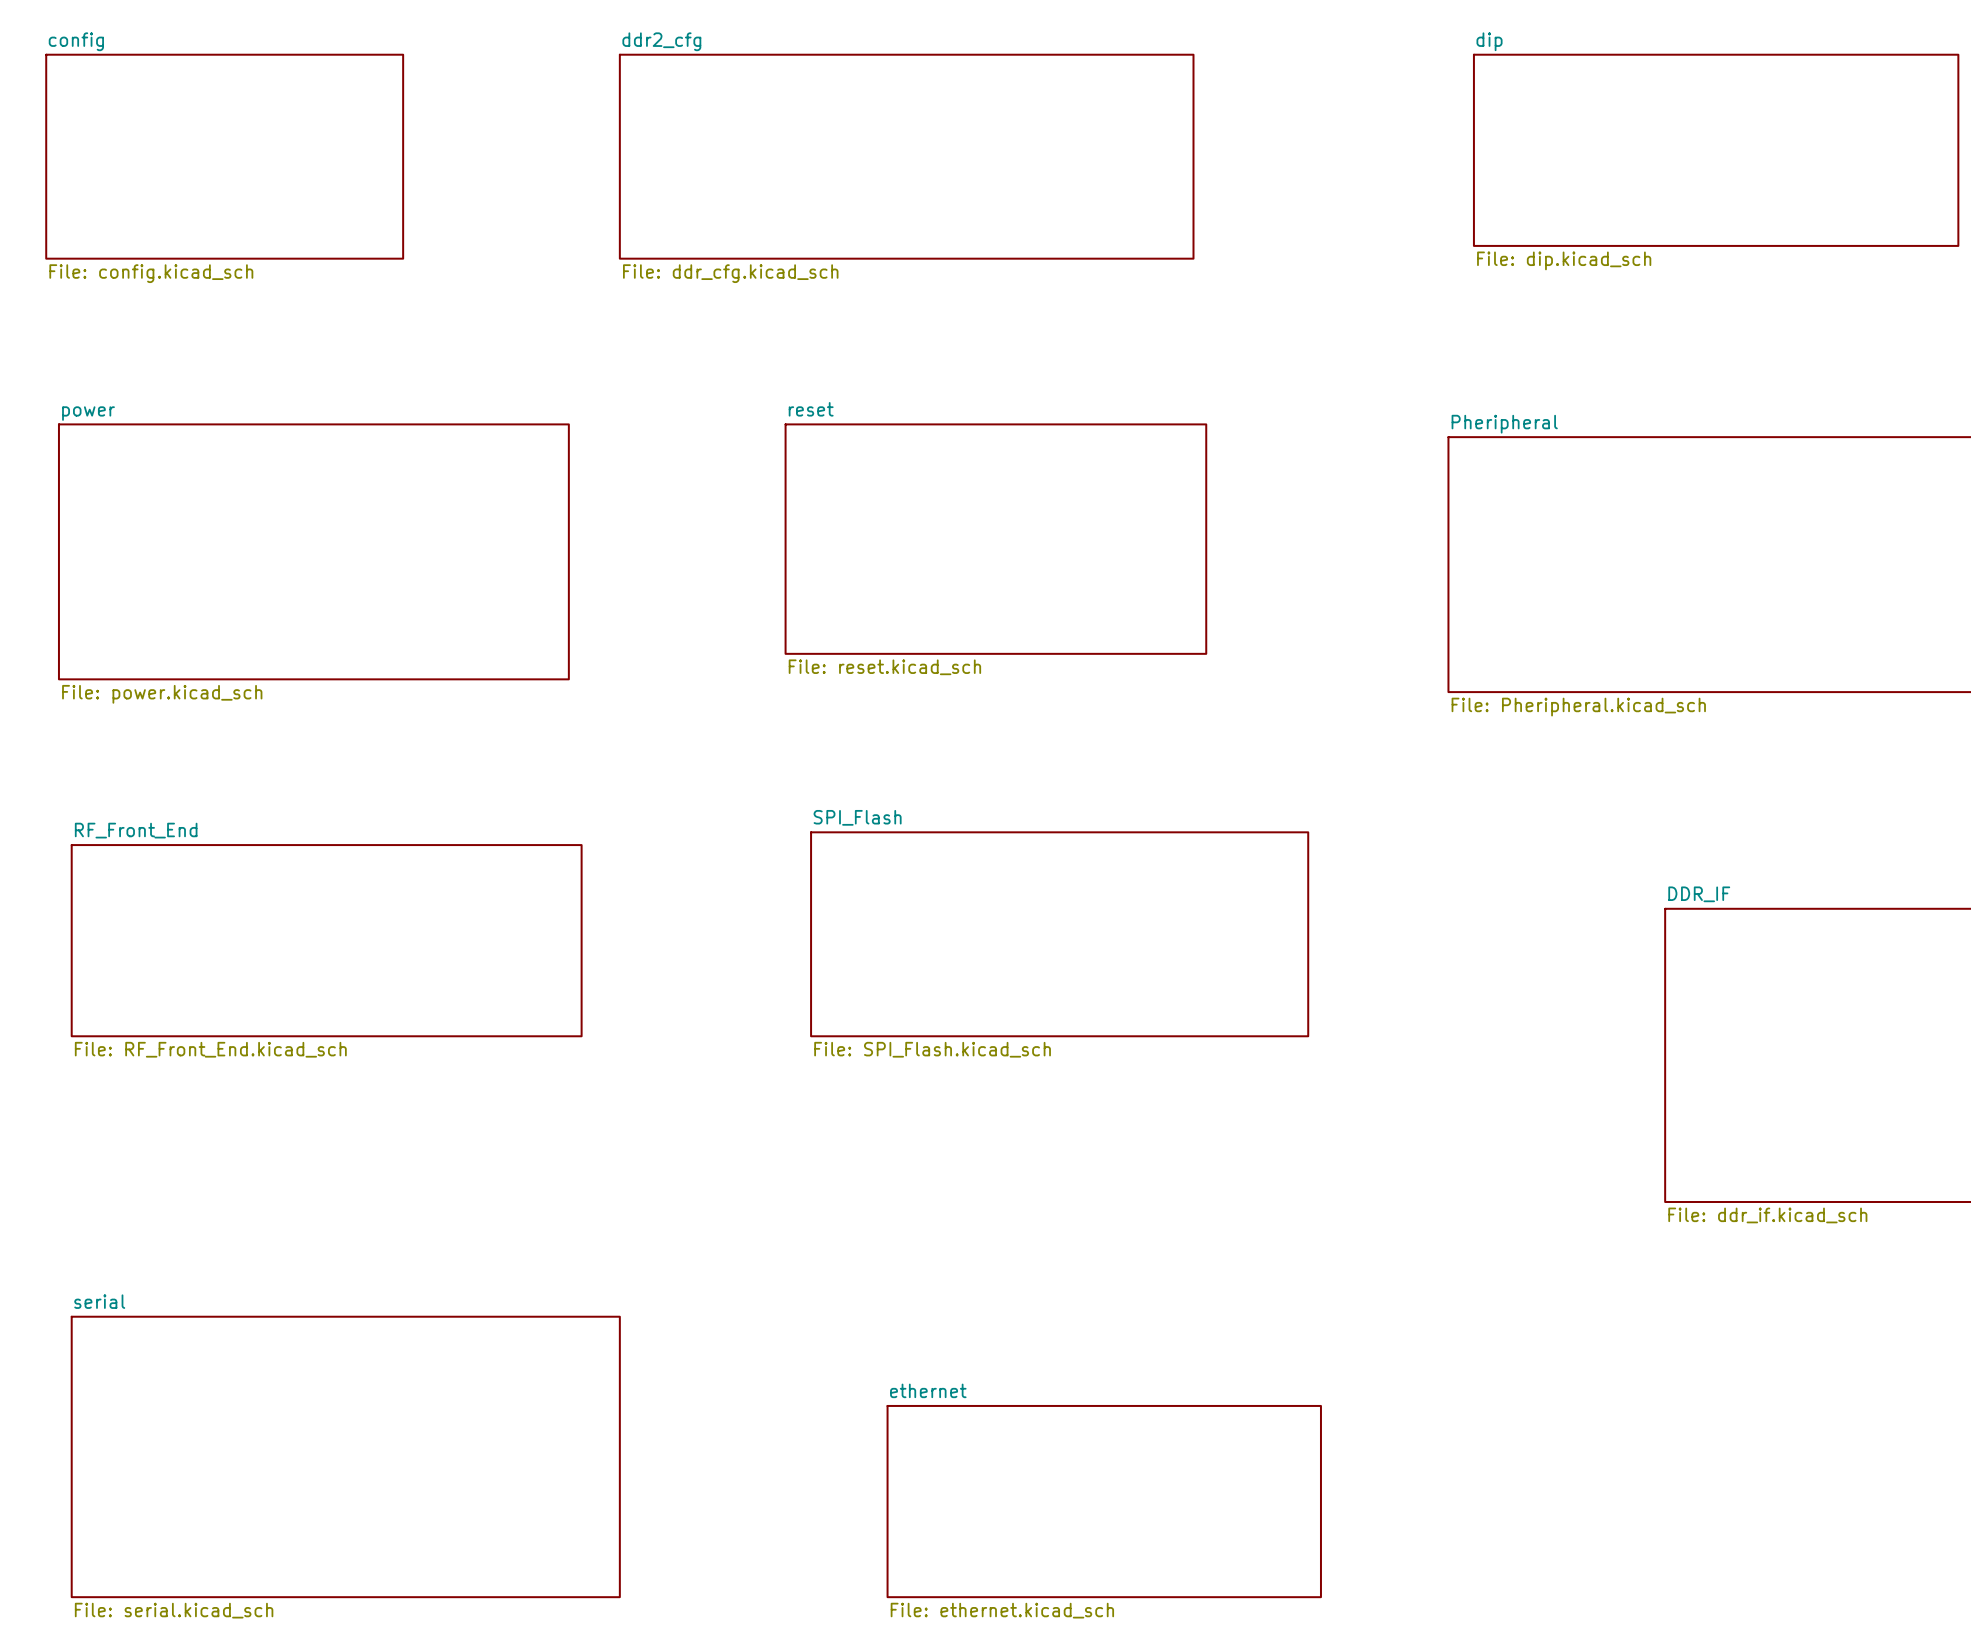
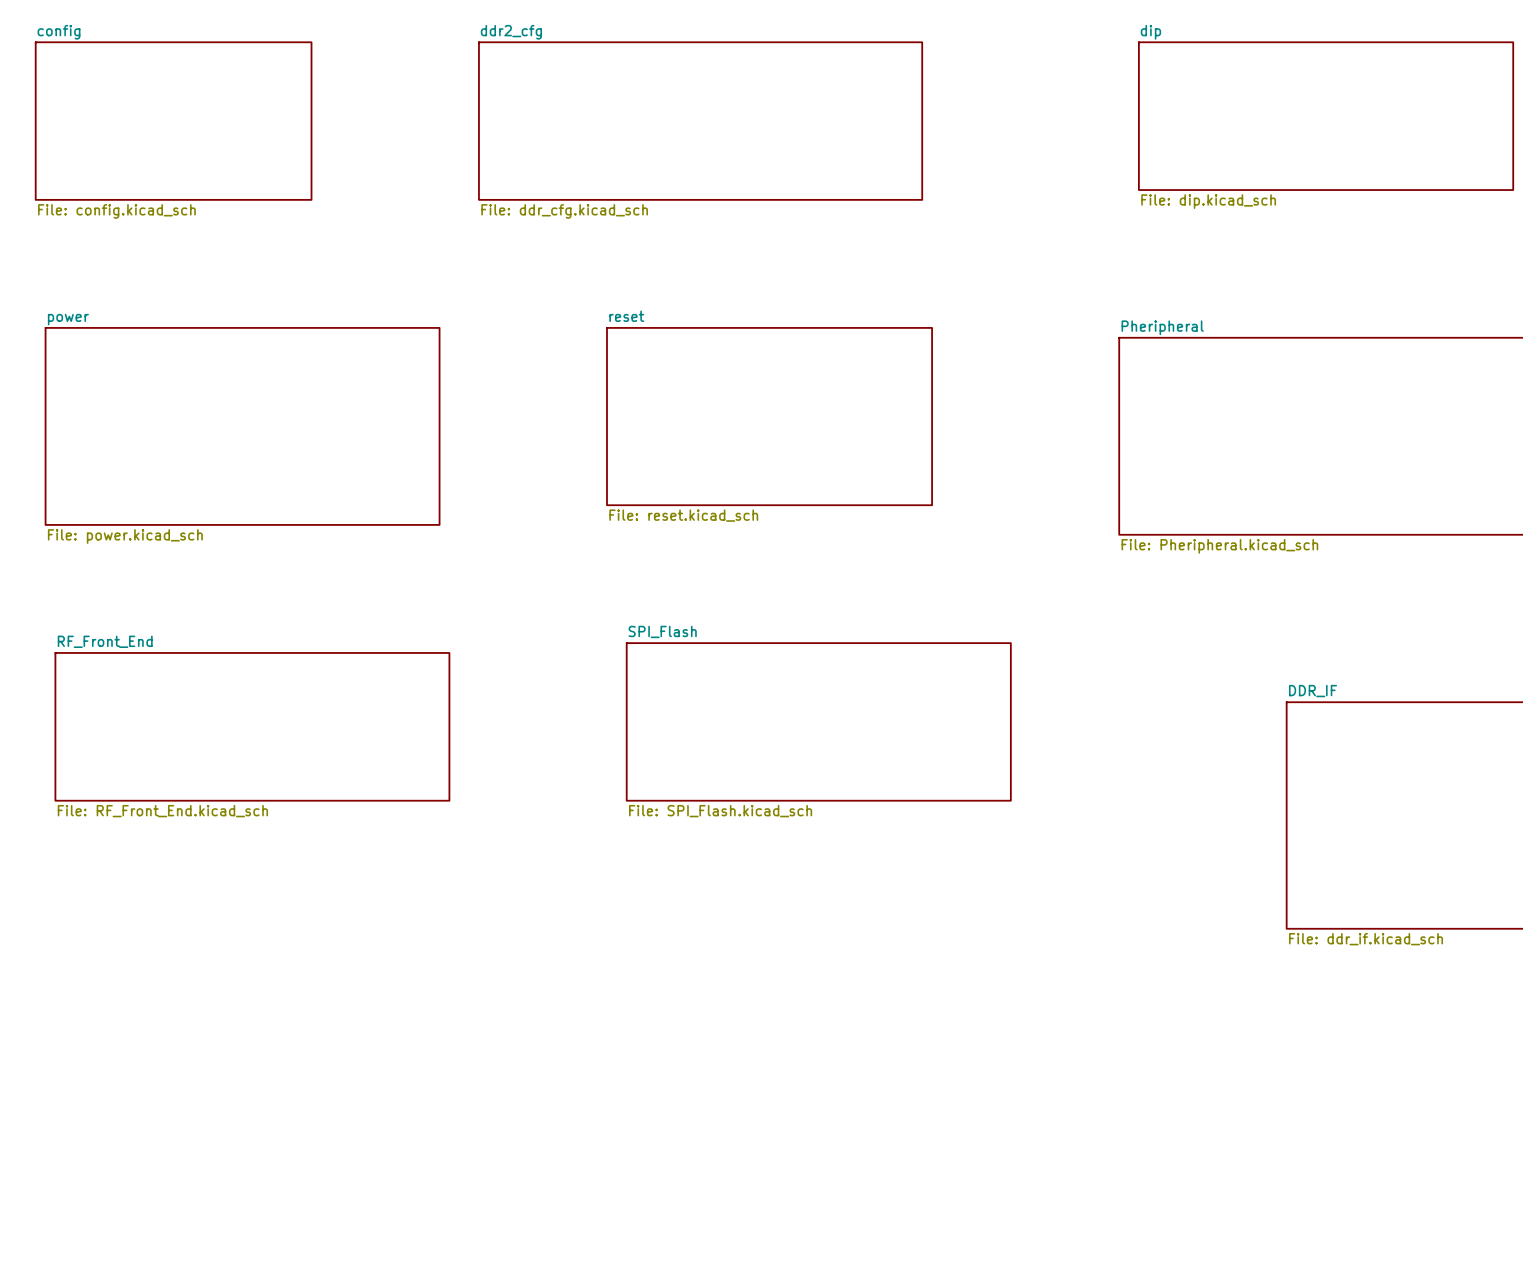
sheet serial: File: serial.kicad_sch (345, 1456) -> none
sheet ethernet: File: ethernet.kicad_sch (1104, 1501) -> none

